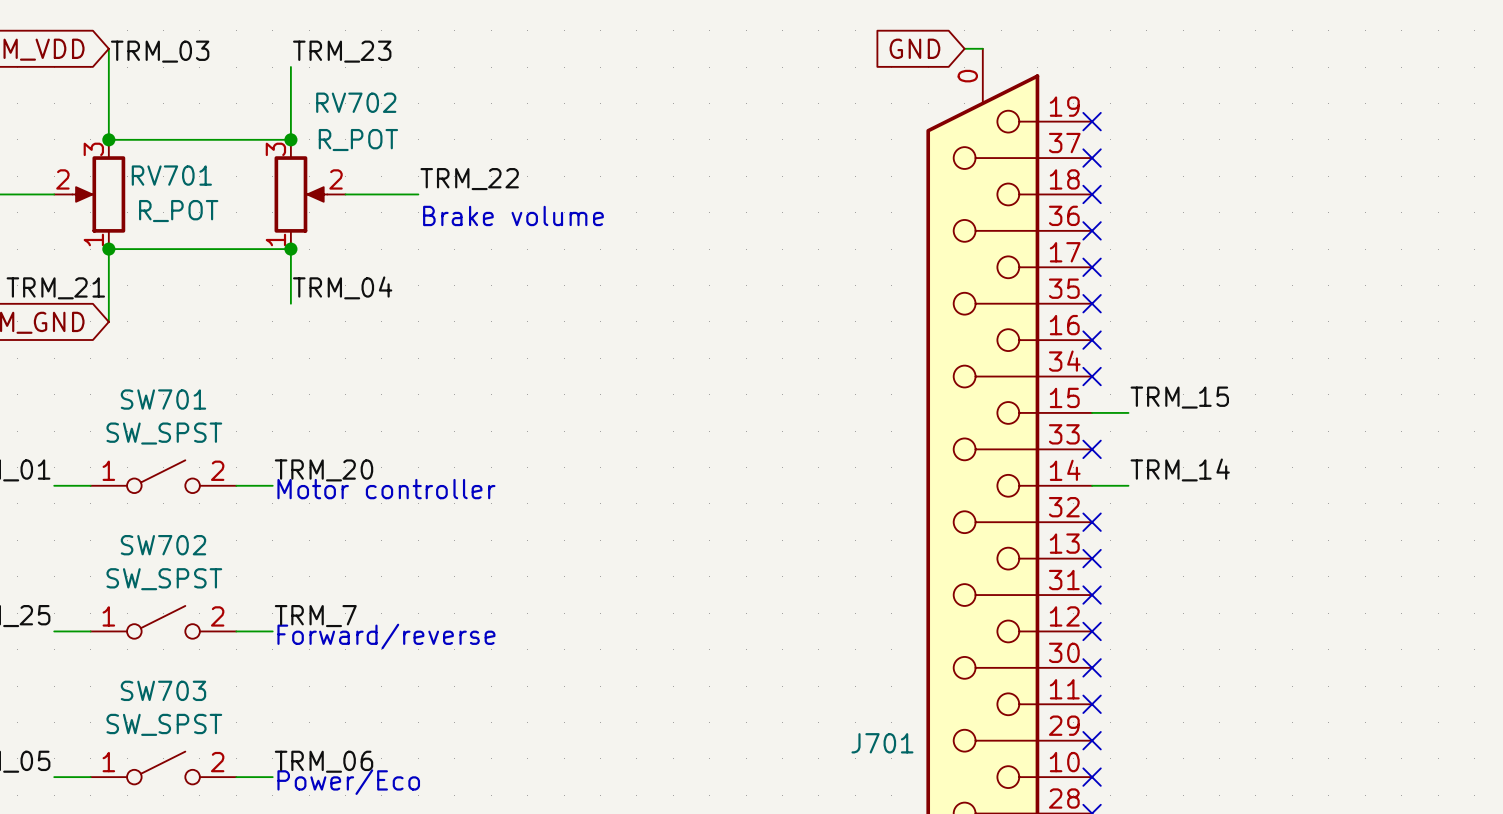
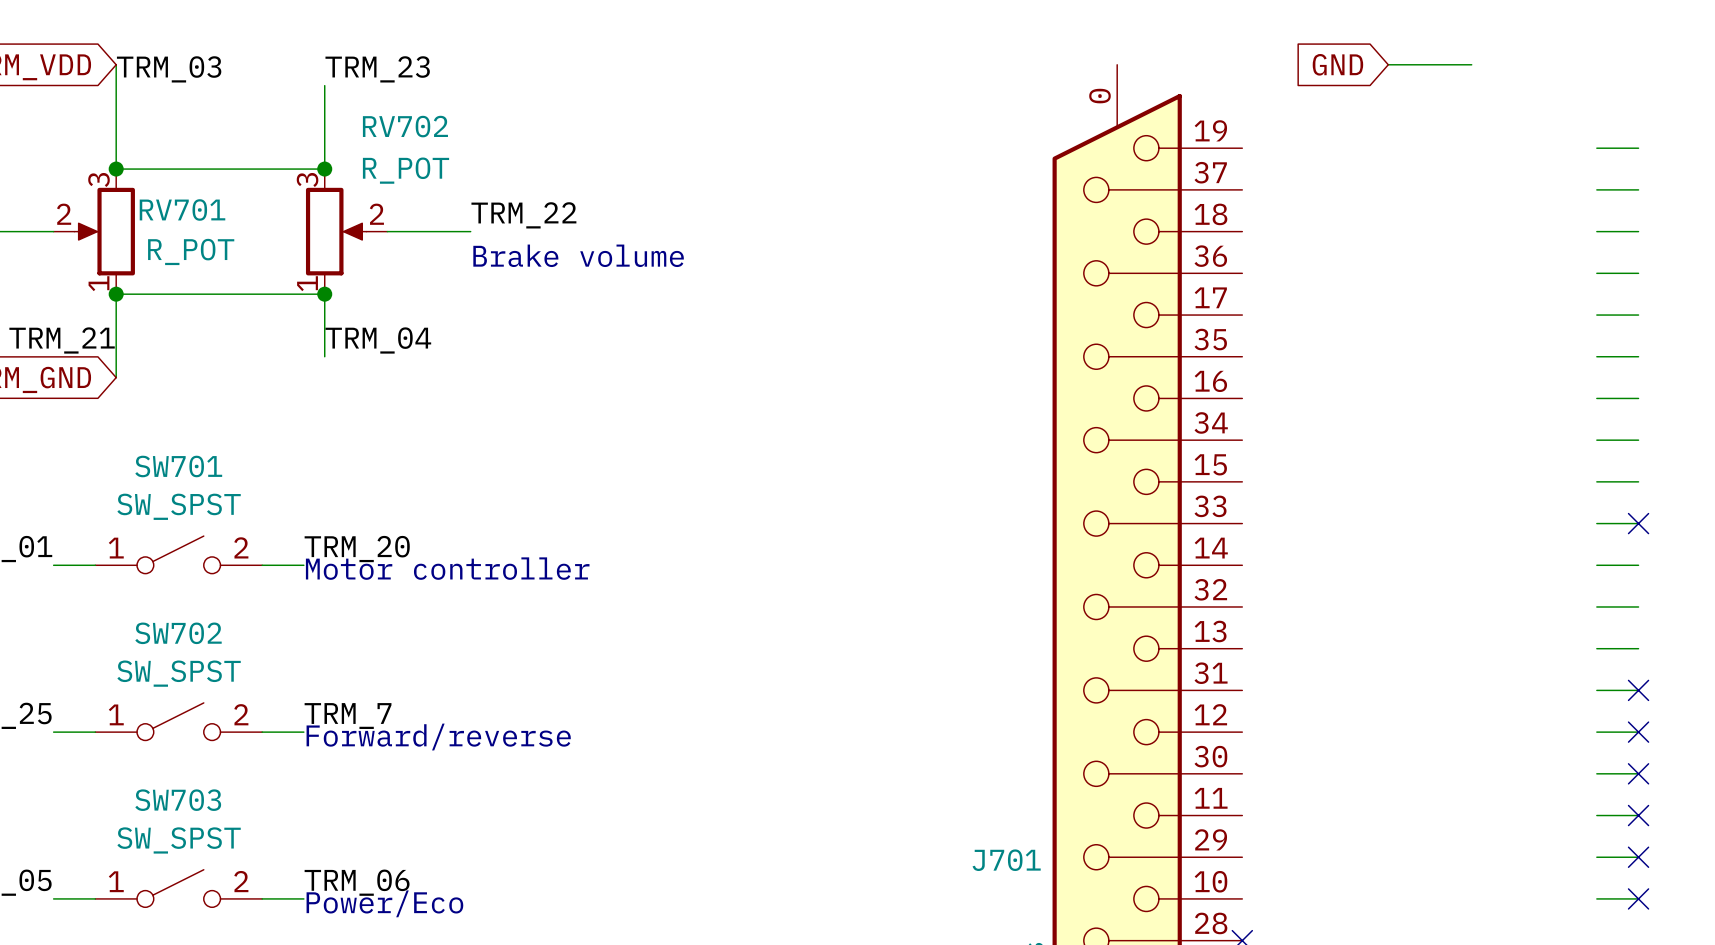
global label position: GND (914, 48) -> GND (1337, 64)
wire: (964, 48) (982, 48) -> none
wire: none -> (1388, 64) (1471, 64)
no-connect mark: (1092, 121) -> none
wire: none -> (1596, 148) (1638, 148)
no-connect mark: (1092, 158) -> none
wire: none -> (1596, 189) (1638, 189)
no-connect mark: (1092, 194) -> none
wire: none -> (1596, 231) (1638, 231)
no-connect mark: (1092, 230) -> none
wire: none -> (1596, 273) (1638, 273)
no-connect mark: (1092, 267) -> none
wire: none -> (1596, 315) (1638, 315)
no-connect mark: (1092, 303) -> none
wire: none -> (1596, 356) (1638, 356)
no-connect mark: (1092, 340) -> none
wire: none -> (1596, 398) (1638, 398)
no-connect mark: (1092, 376) -> none
wire: none -> (1596, 440) (1638, 440)
label: TRM_15 (1179, 397) -> none
wire: (1092, 412) (1128, 412) -> (1596, 481) (1638, 481)
no-connect mark: (1092, 449) -> none
wire: none -> (1596, 523) (1638, 523)
no-connect mark: none -> (1638, 523)
label: TRM_14 (1180, 469) -> none
wire: (1092, 485) (1128, 485) -> (1596, 565) (1638, 565)
no-connect mark: (1092, 522) -> none
wire: none -> (1596, 606) (1638, 606)
no-connect mark: (1092, 558) -> none
wire: none -> (1596, 648) (1638, 648)
no-connect mark: (1092, 595) -> none
wire: none -> (1596, 690) (1638, 690)
no-connect mark: none -> (1638, 690)
no-connect mark: (1092, 631) -> none
wire: none -> (1596, 732) (1638, 732)
no-connect mark: none -> (1638, 732)
no-connect mark: (1092, 667) -> none
wire: none -> (1596, 773) (1638, 773)
no-connect mark: none -> (1638, 773)
no-connect mark: (1092, 704) -> none
wire: none -> (1596, 815) (1638, 815)
no-connect mark: none -> (1638, 815)
no-connect mark: (1092, 740) -> none
wire: none -> (1596, 857) (1638, 857)
no-connect mark: none -> (1638, 857)
no-connect mark: (1092, 777) -> none
wire: none -> (1596, 898) (1638, 898)
no-connect mark: none -> (1638, 898)

